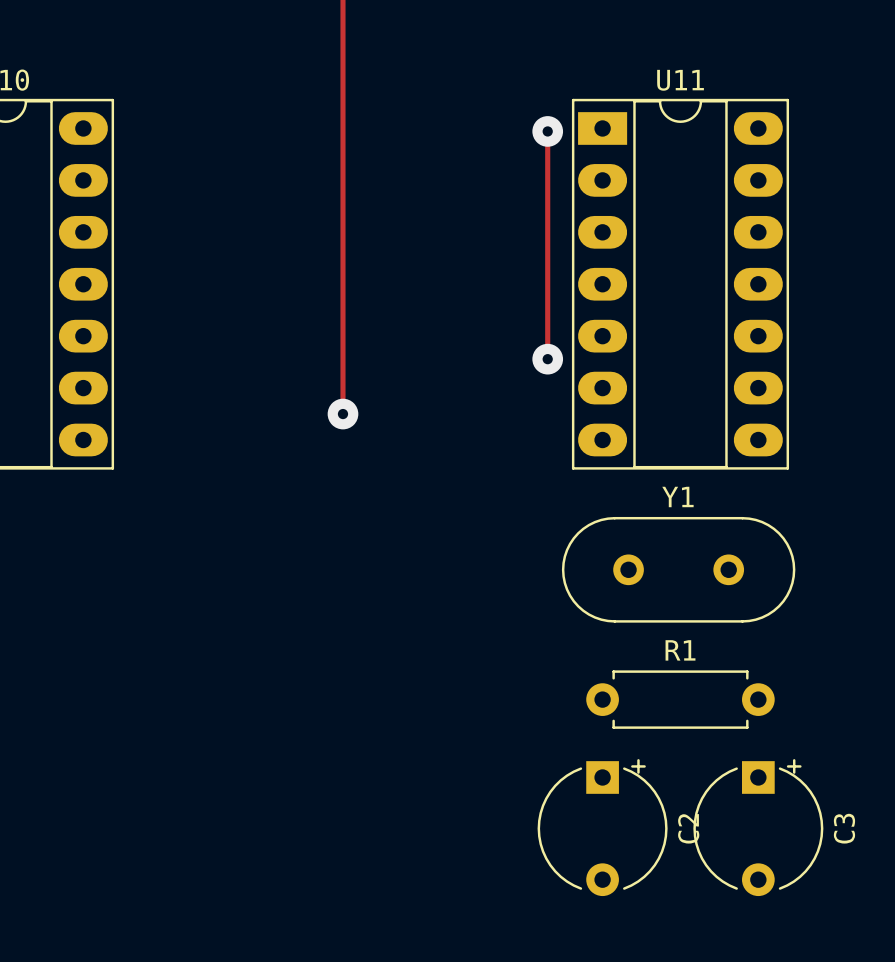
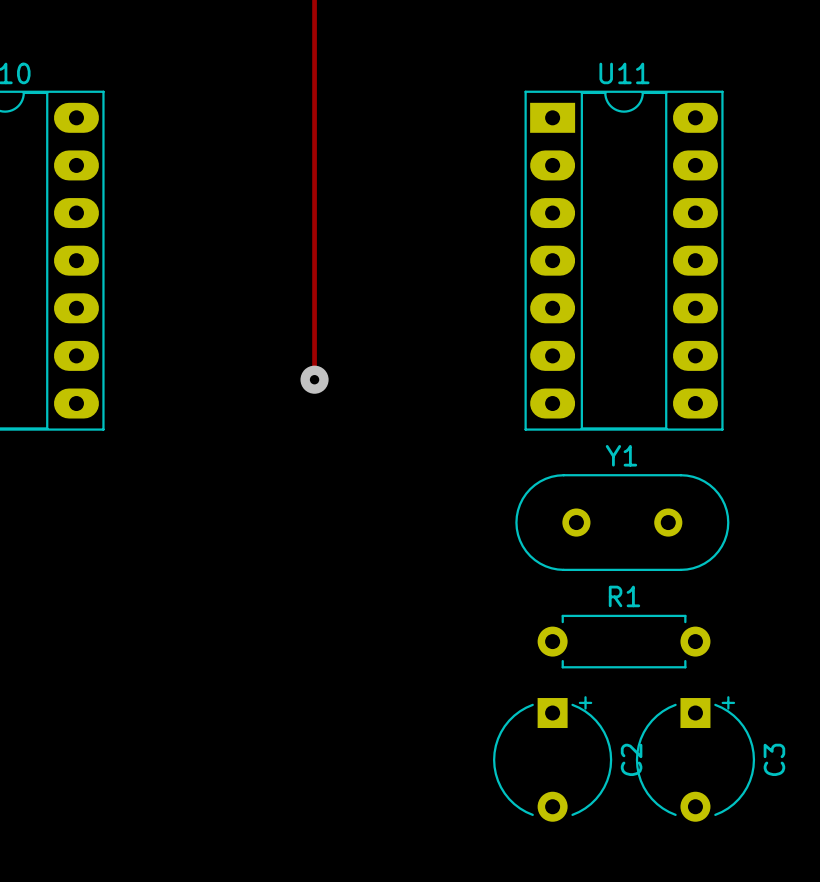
track: (547, 131) (547, 359) -> none
via: (547, 131) -> none
via: (547, 359) -> none

